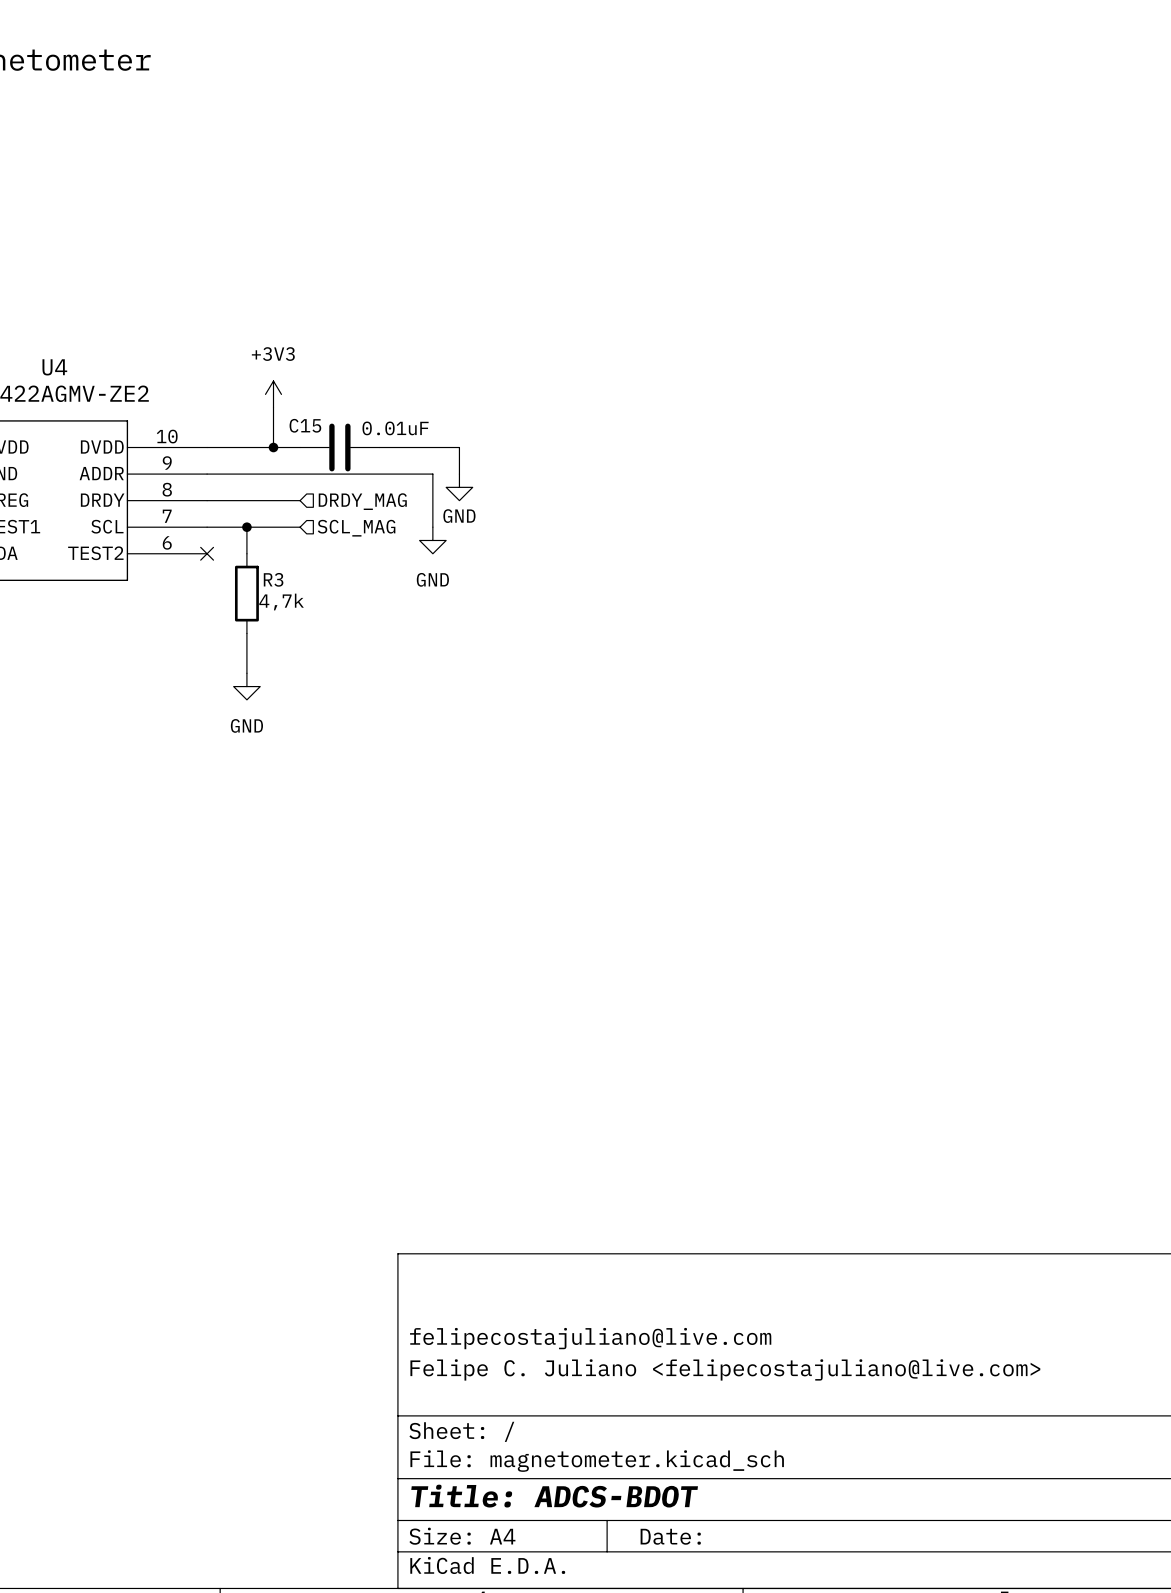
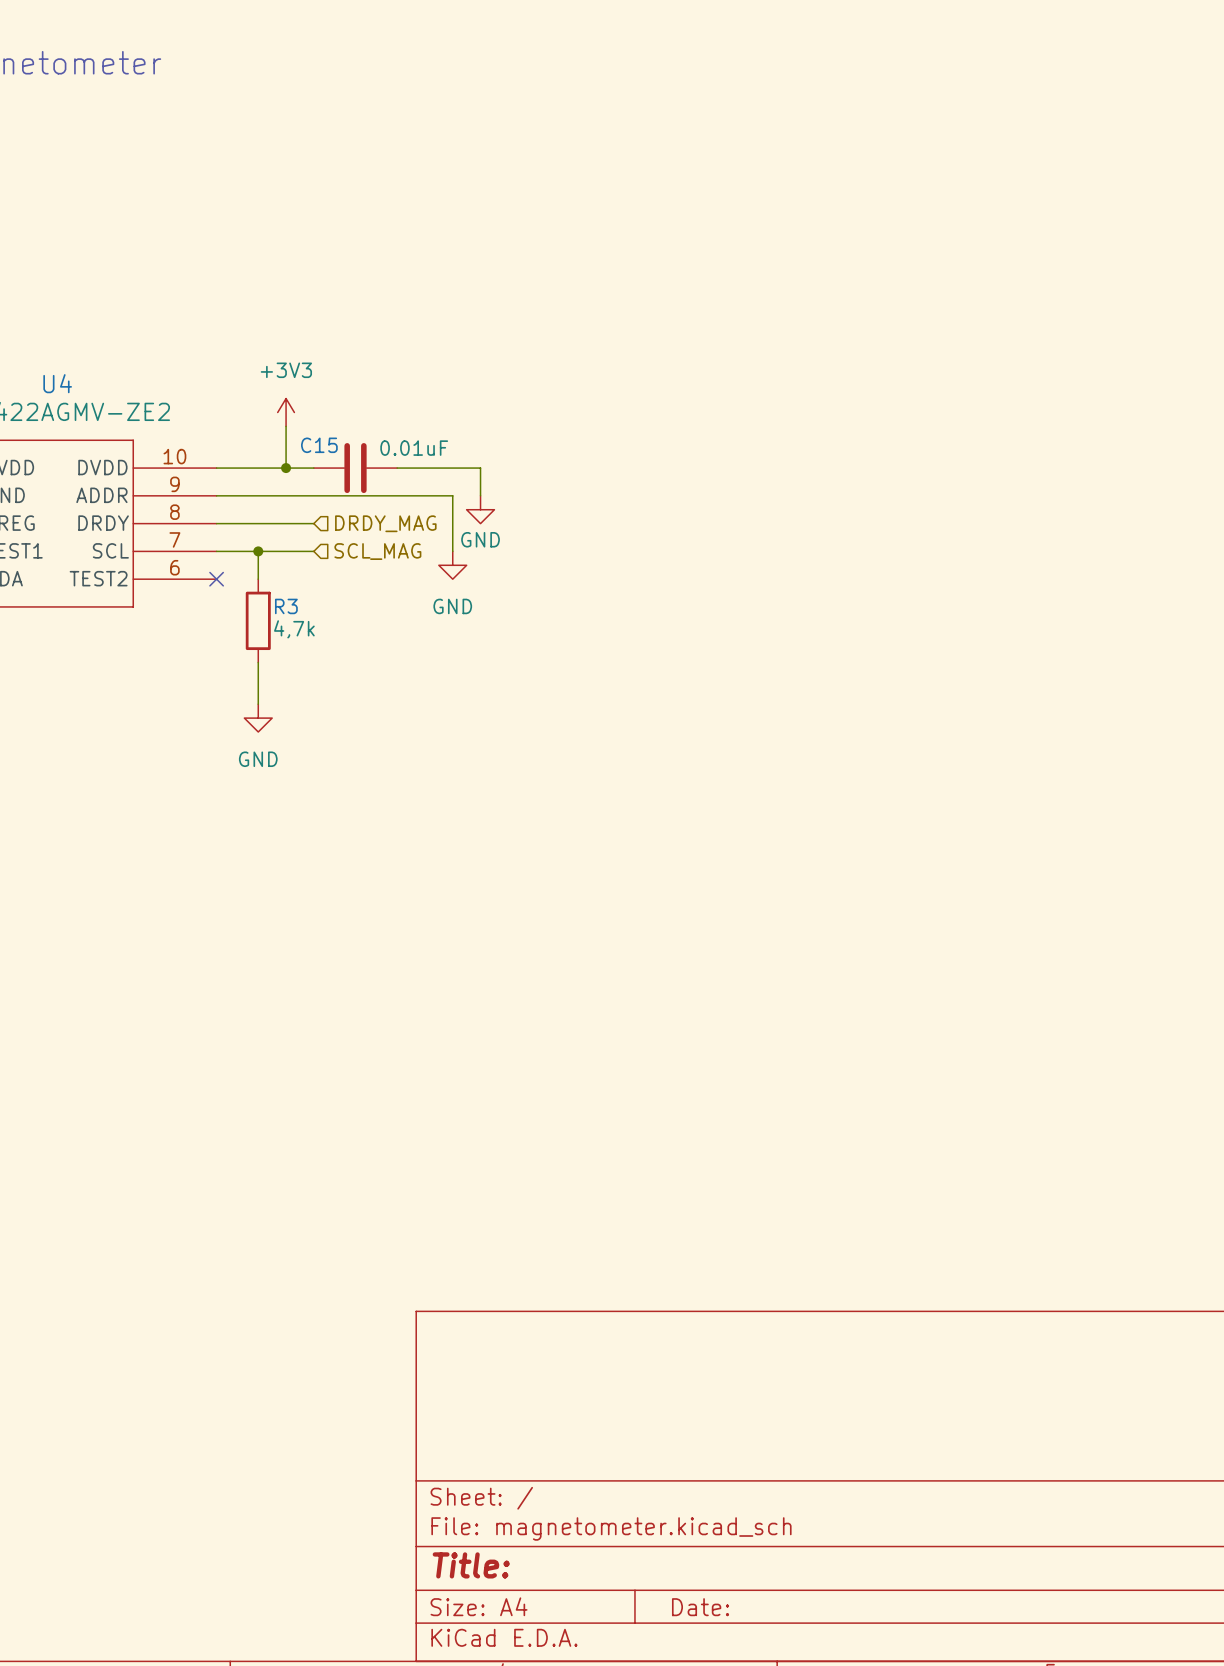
title block: felipecostajuliano@live.com (590, 1338) -> none
title block: Felipe C. Juliano <felipecostajuliano@live.com> (725, 1369) -> none
title block: Title: ADCS-BDOT (554, 1496) -> Title: (471, 1565)

